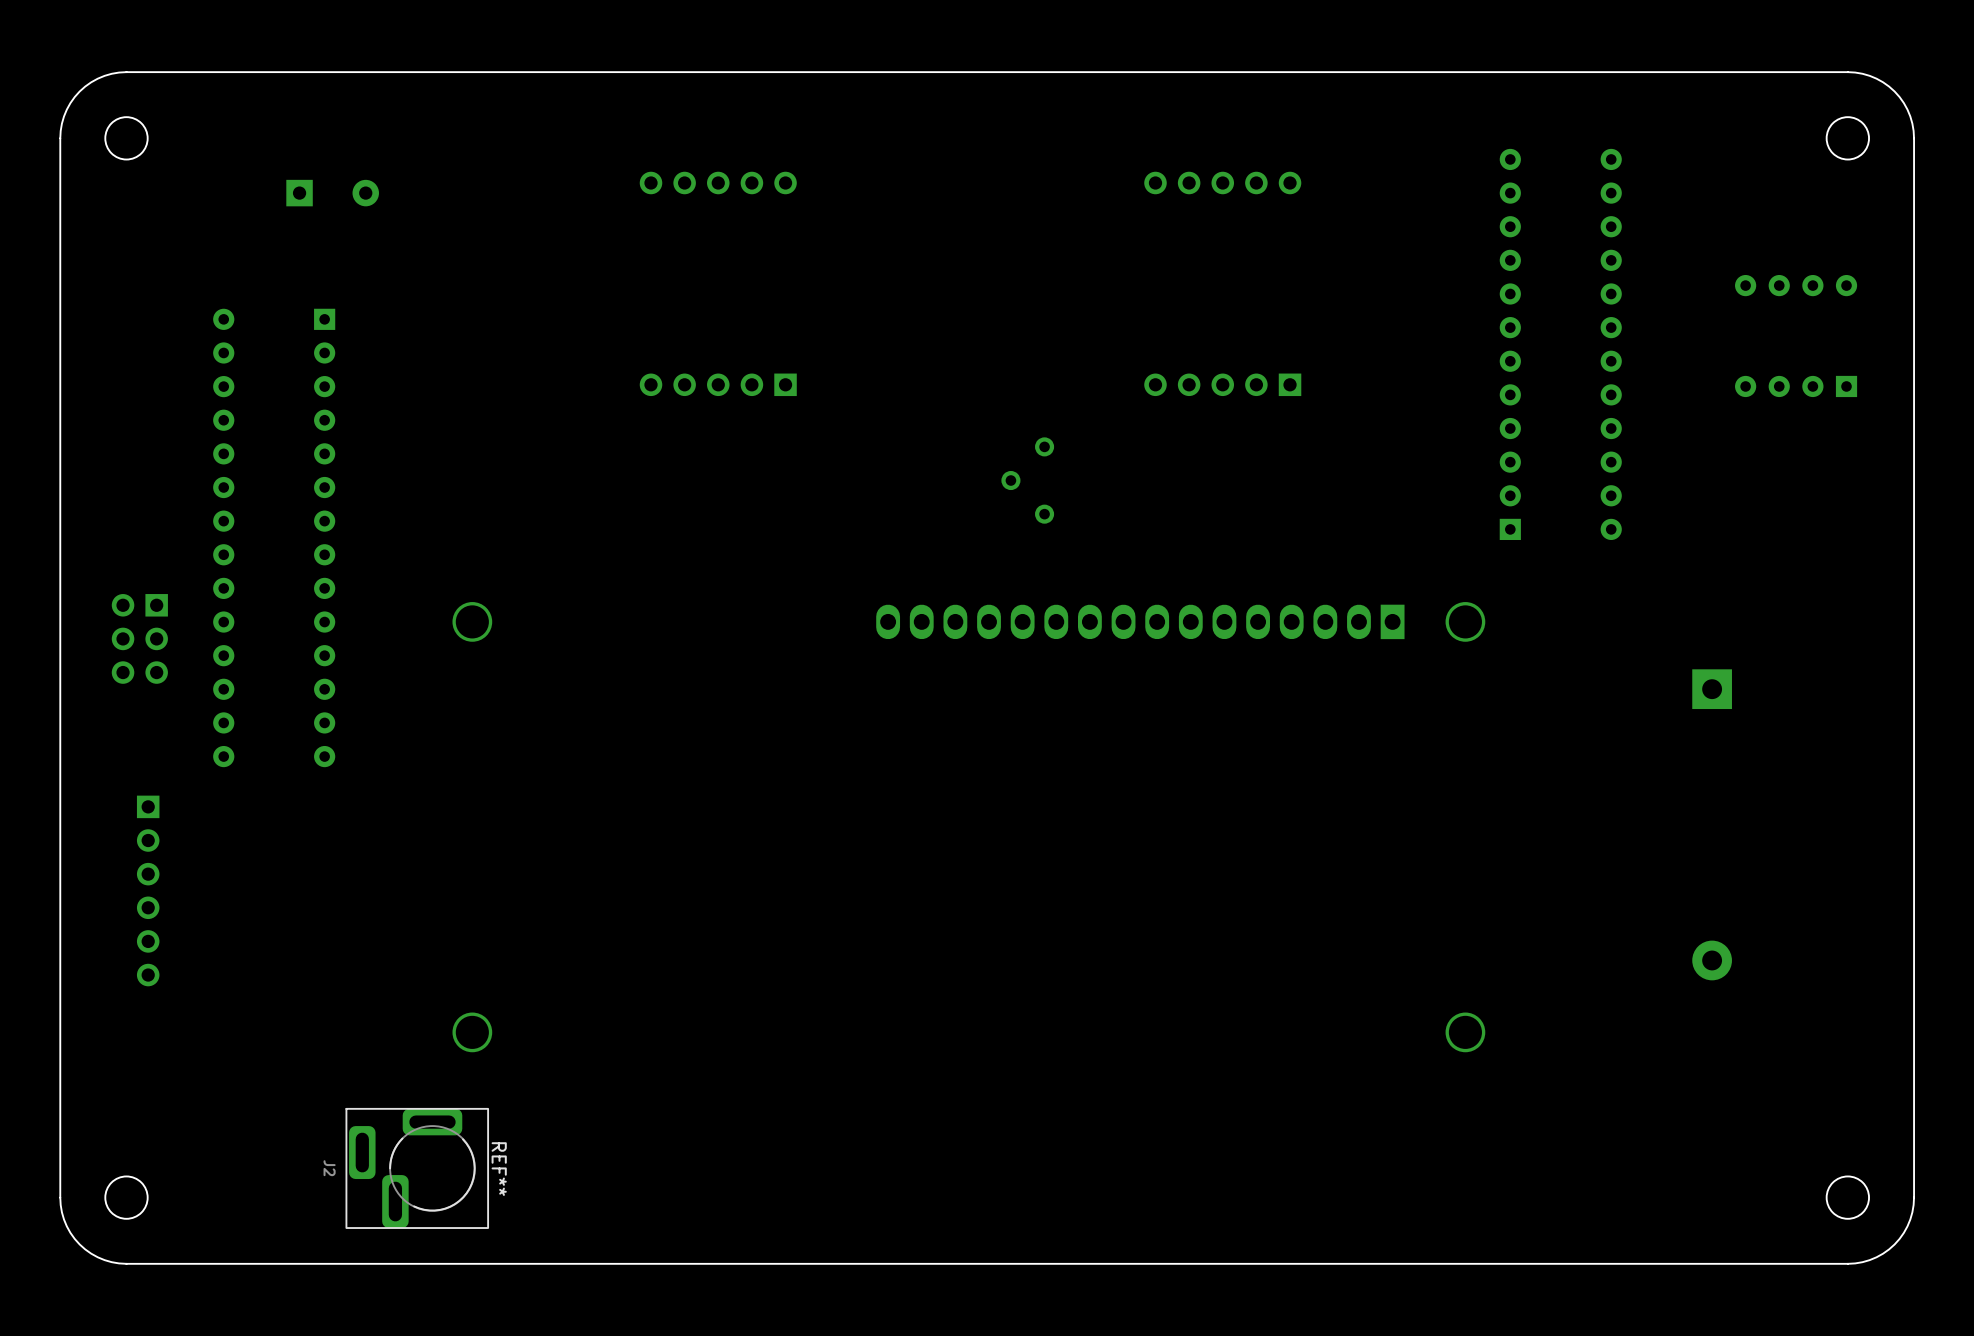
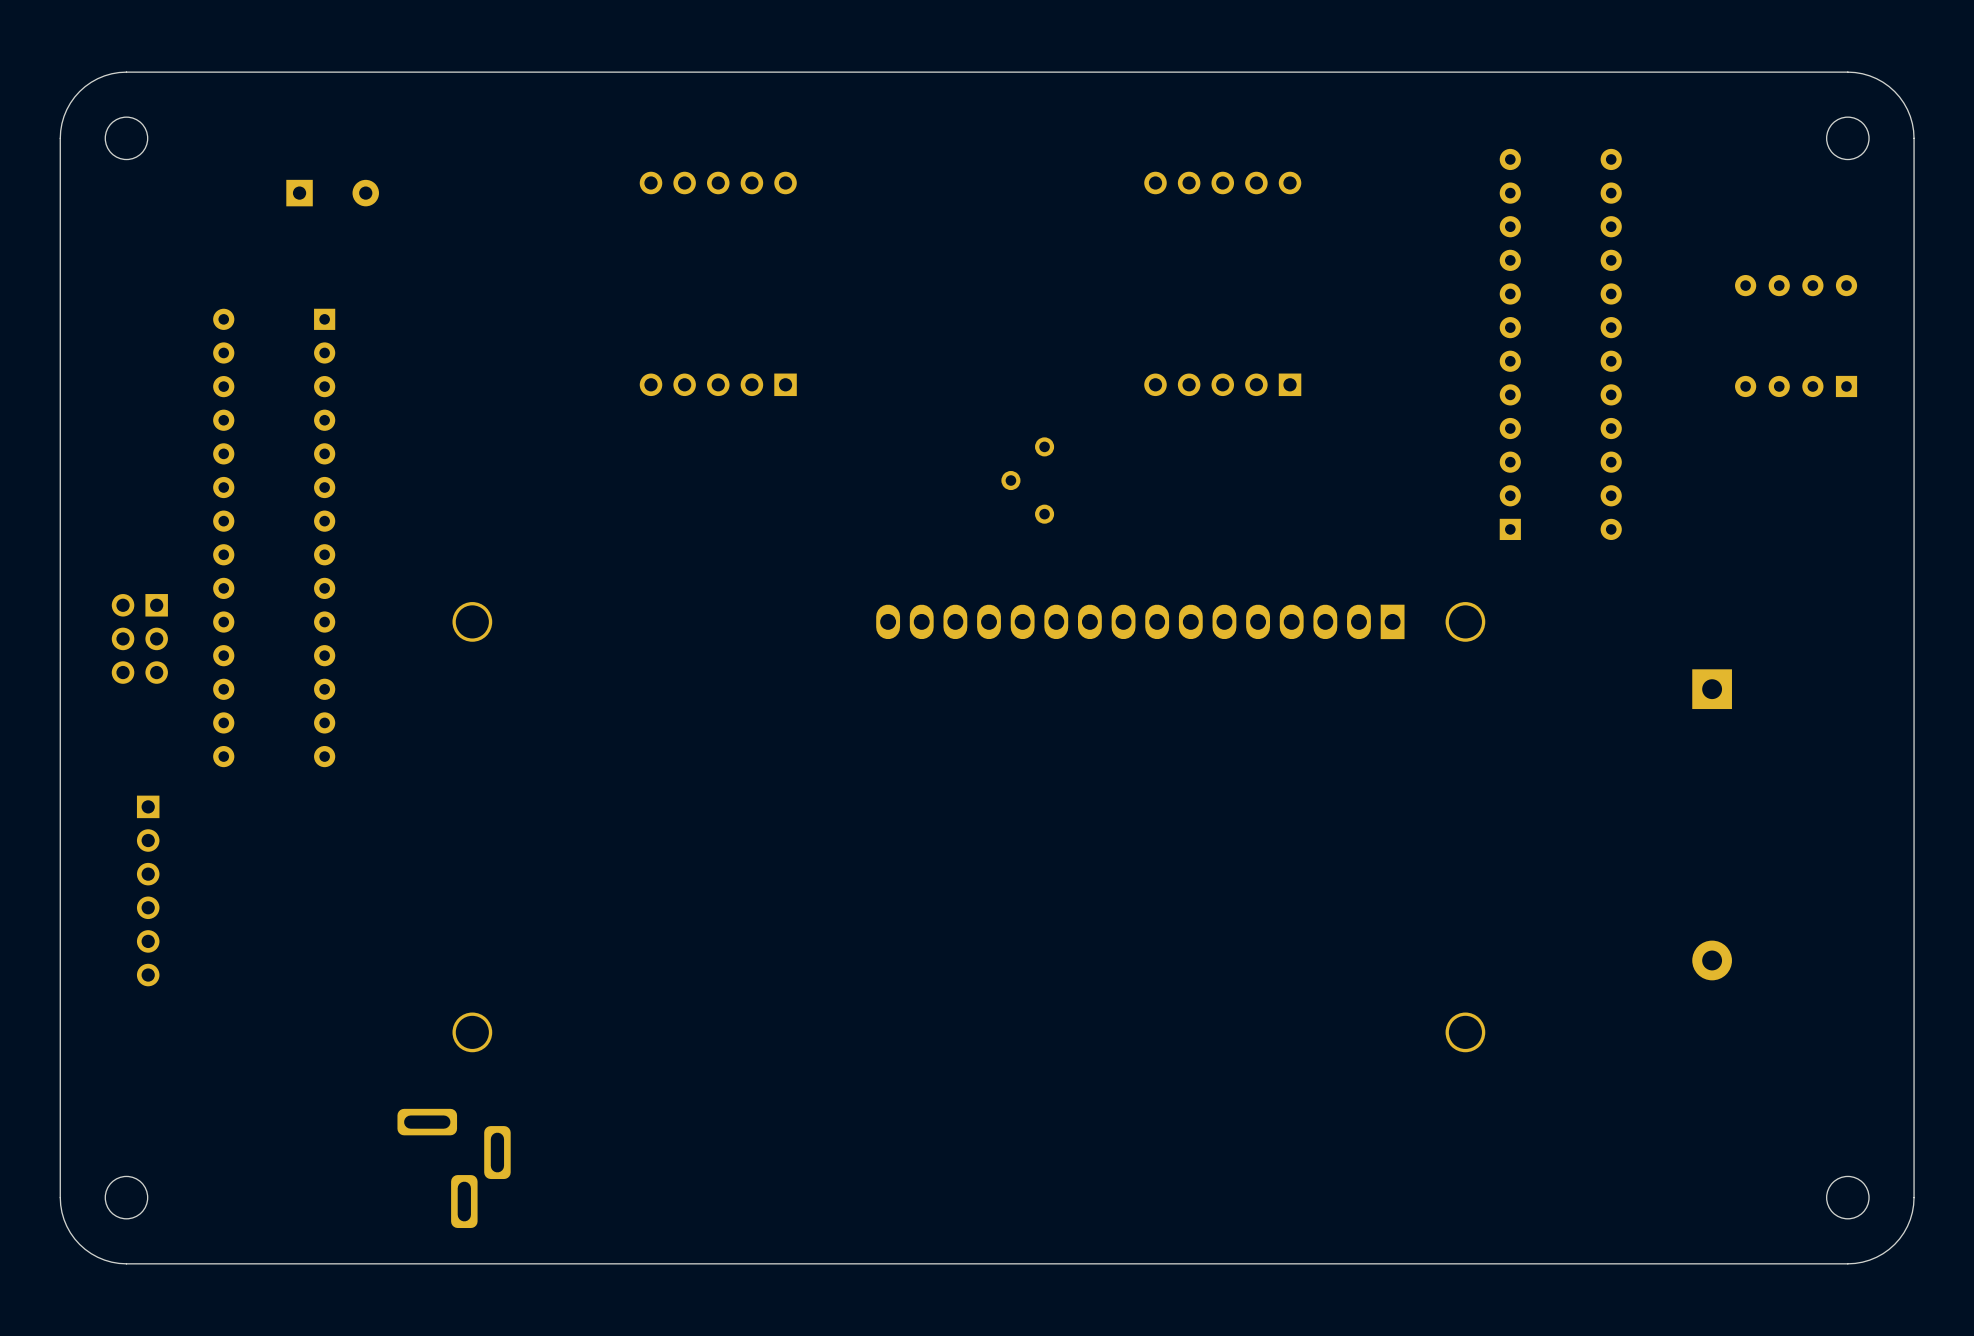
J2 side: bottom (417, 1168) -> top (454, 1168)

